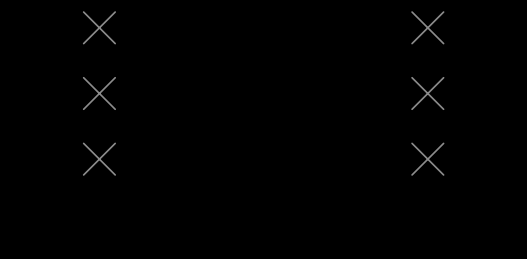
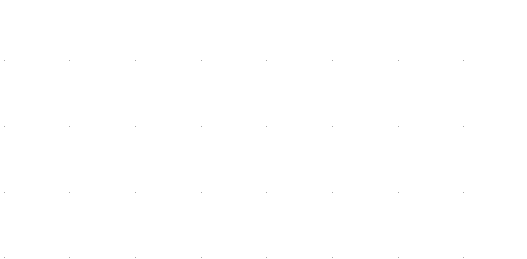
no-connect mark: (99, 27) -> none
no-connect mark: (427, 27) -> none
no-connect mark: (99, 93) -> none
no-connect mark: (427, 93) -> none
no-connect mark: (99, 159) -> none
no-connect mark: (427, 159) -> none

